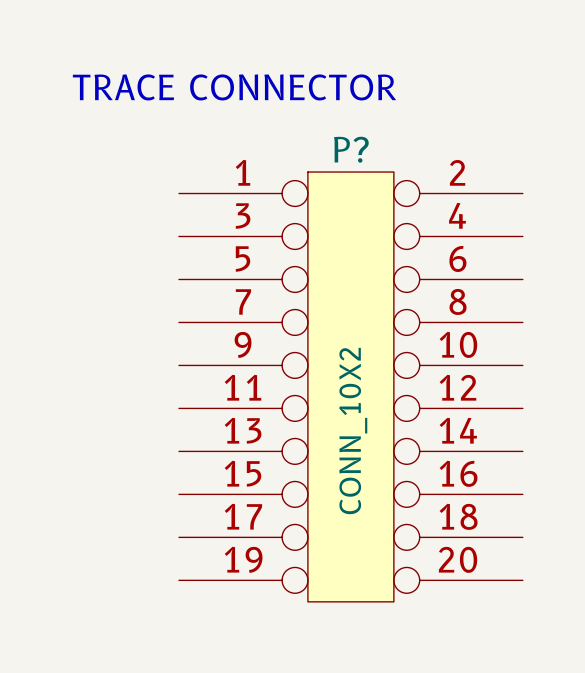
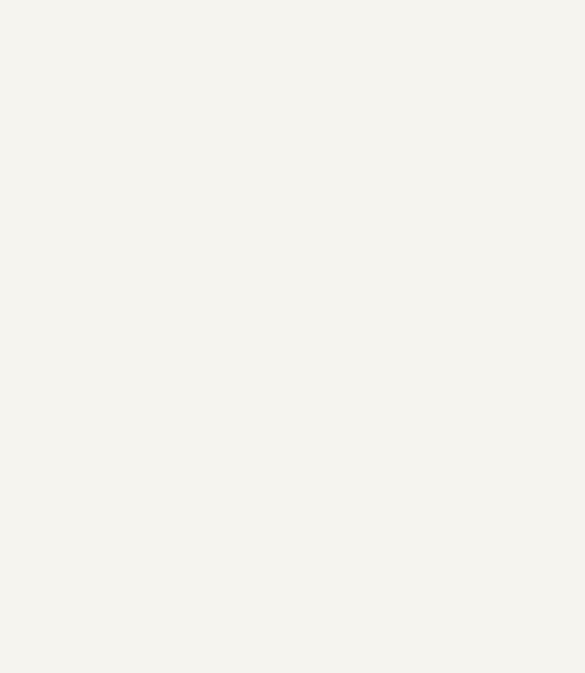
text: TRACE CONNECTOR (234, 87) -> none
P?: CONN_10X2 (350, 386) -> none

